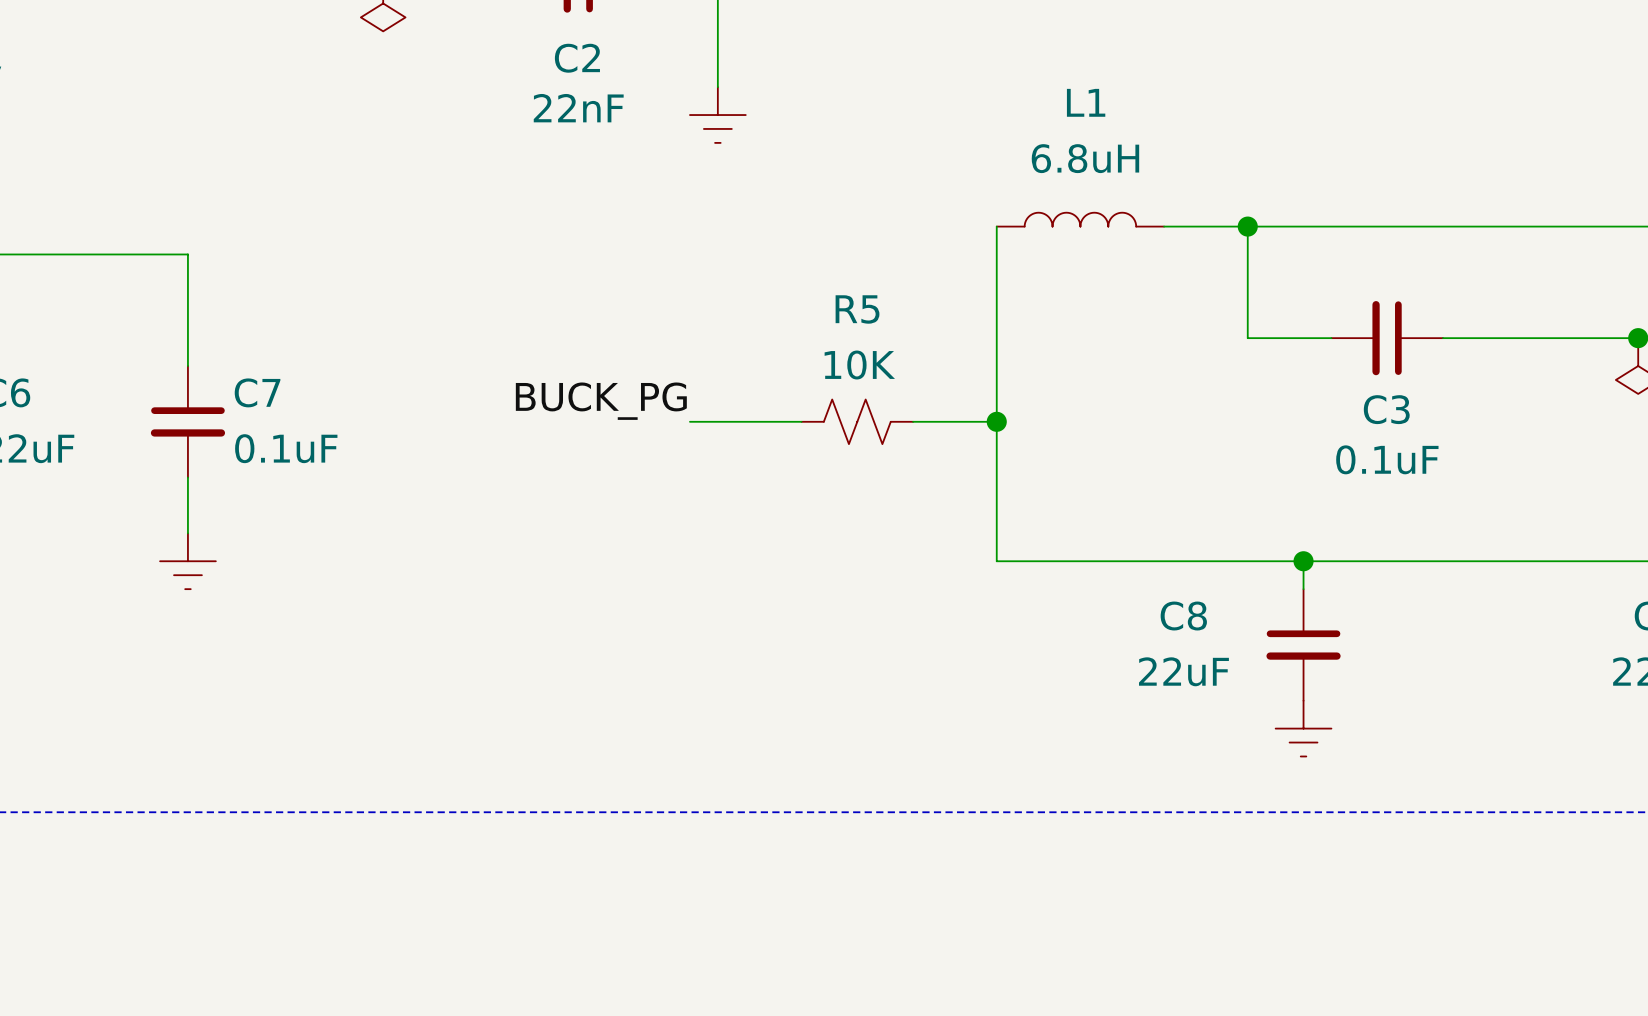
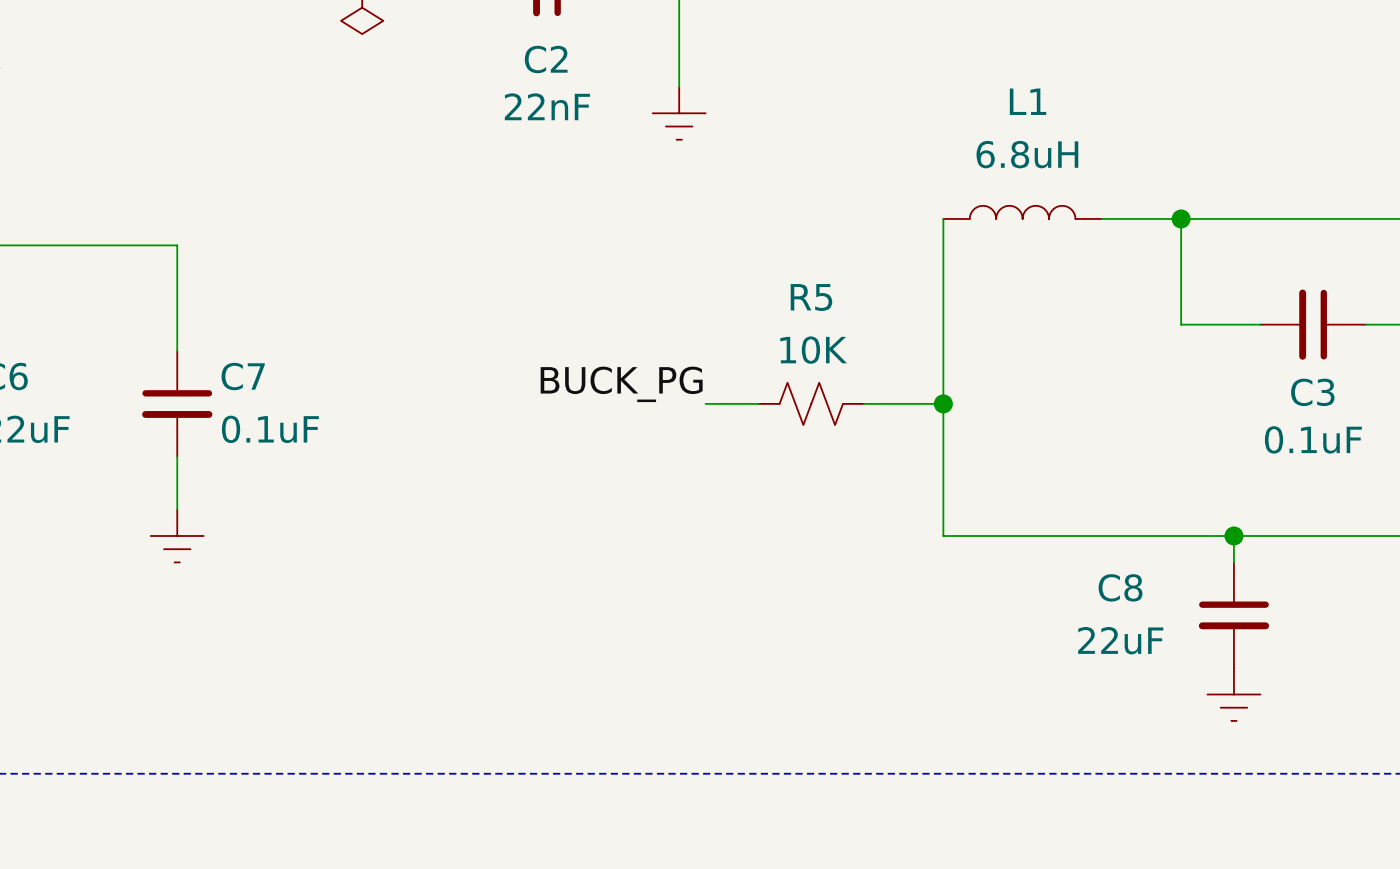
label position: BUCK_PG (601, 401) -> BUCK_PG (621, 384)
wire: (689, 421) (745, 421) -> none

